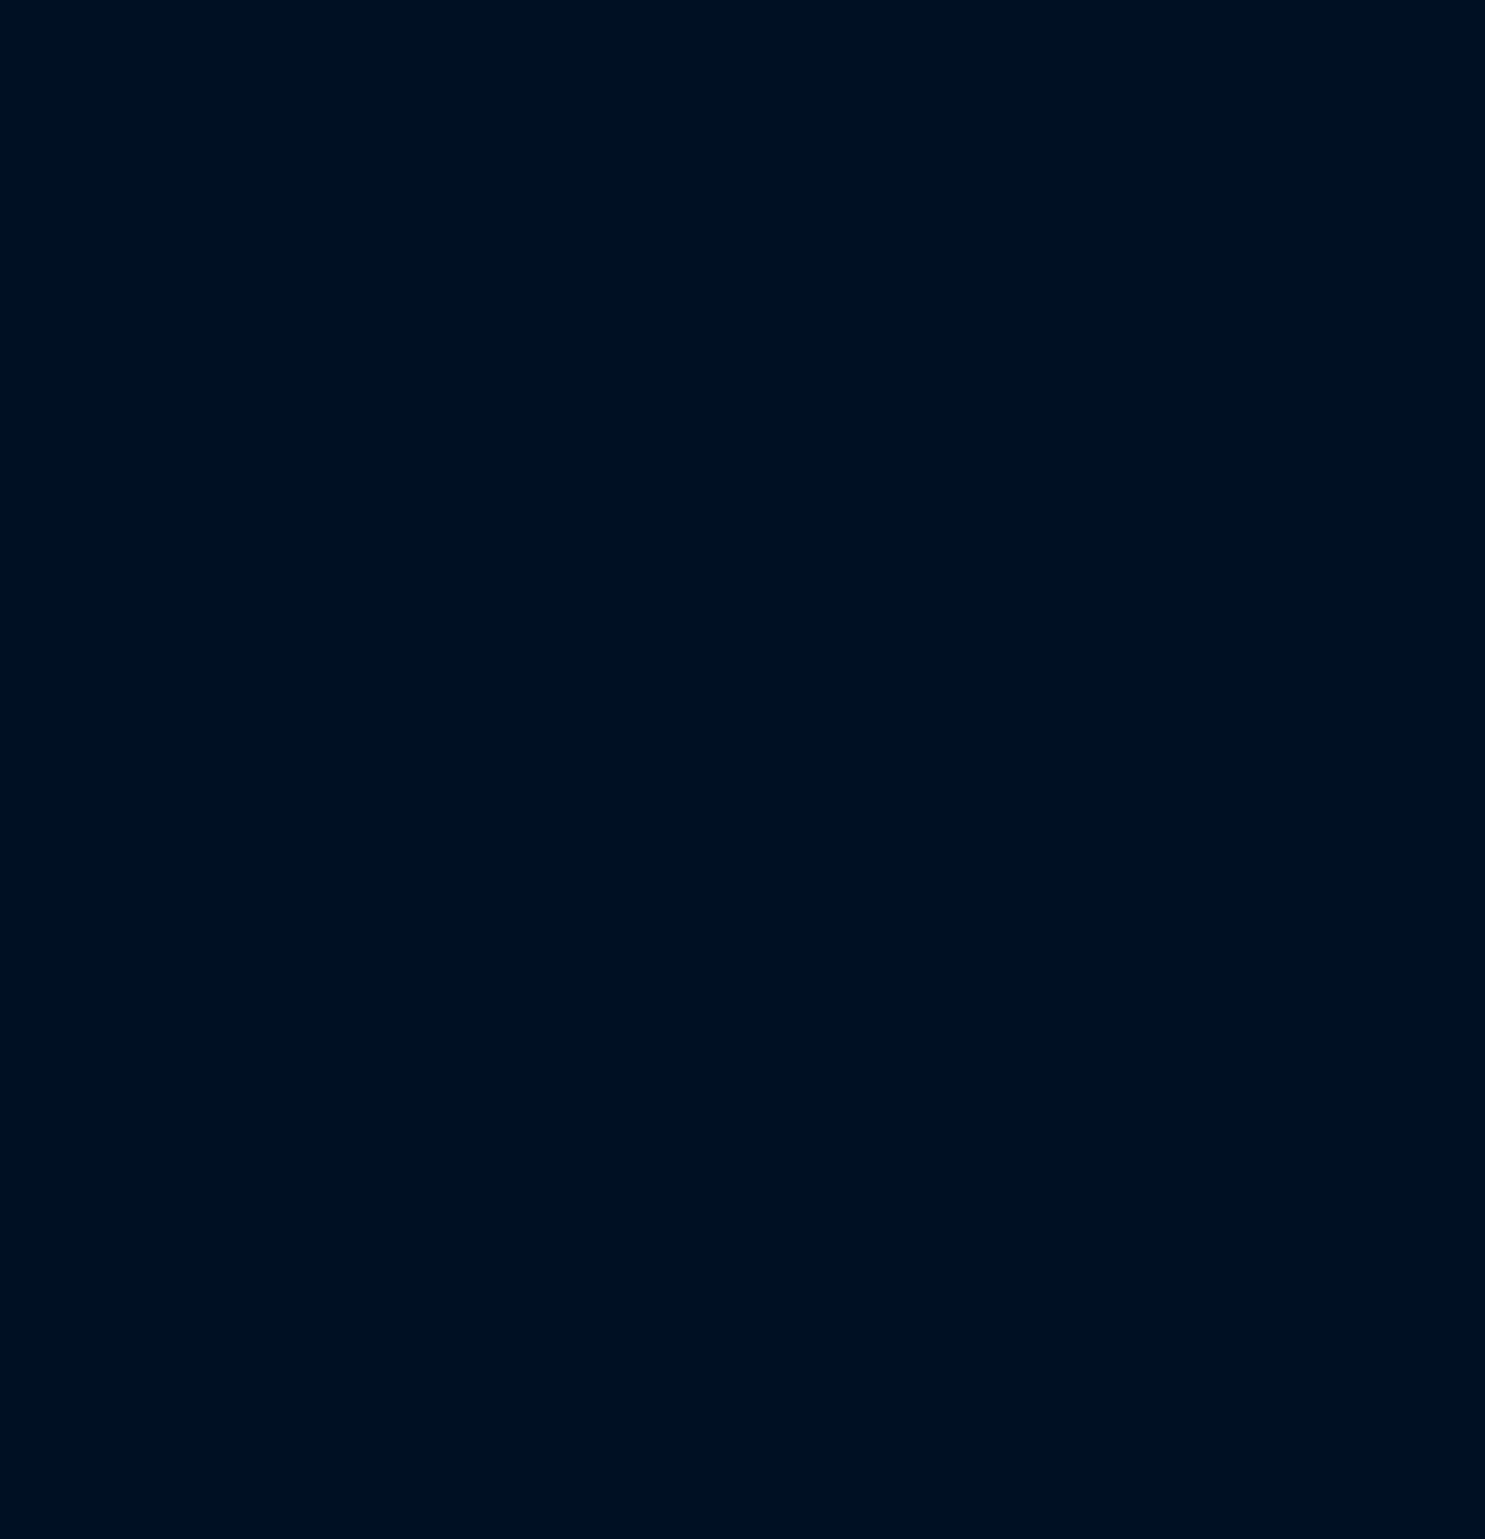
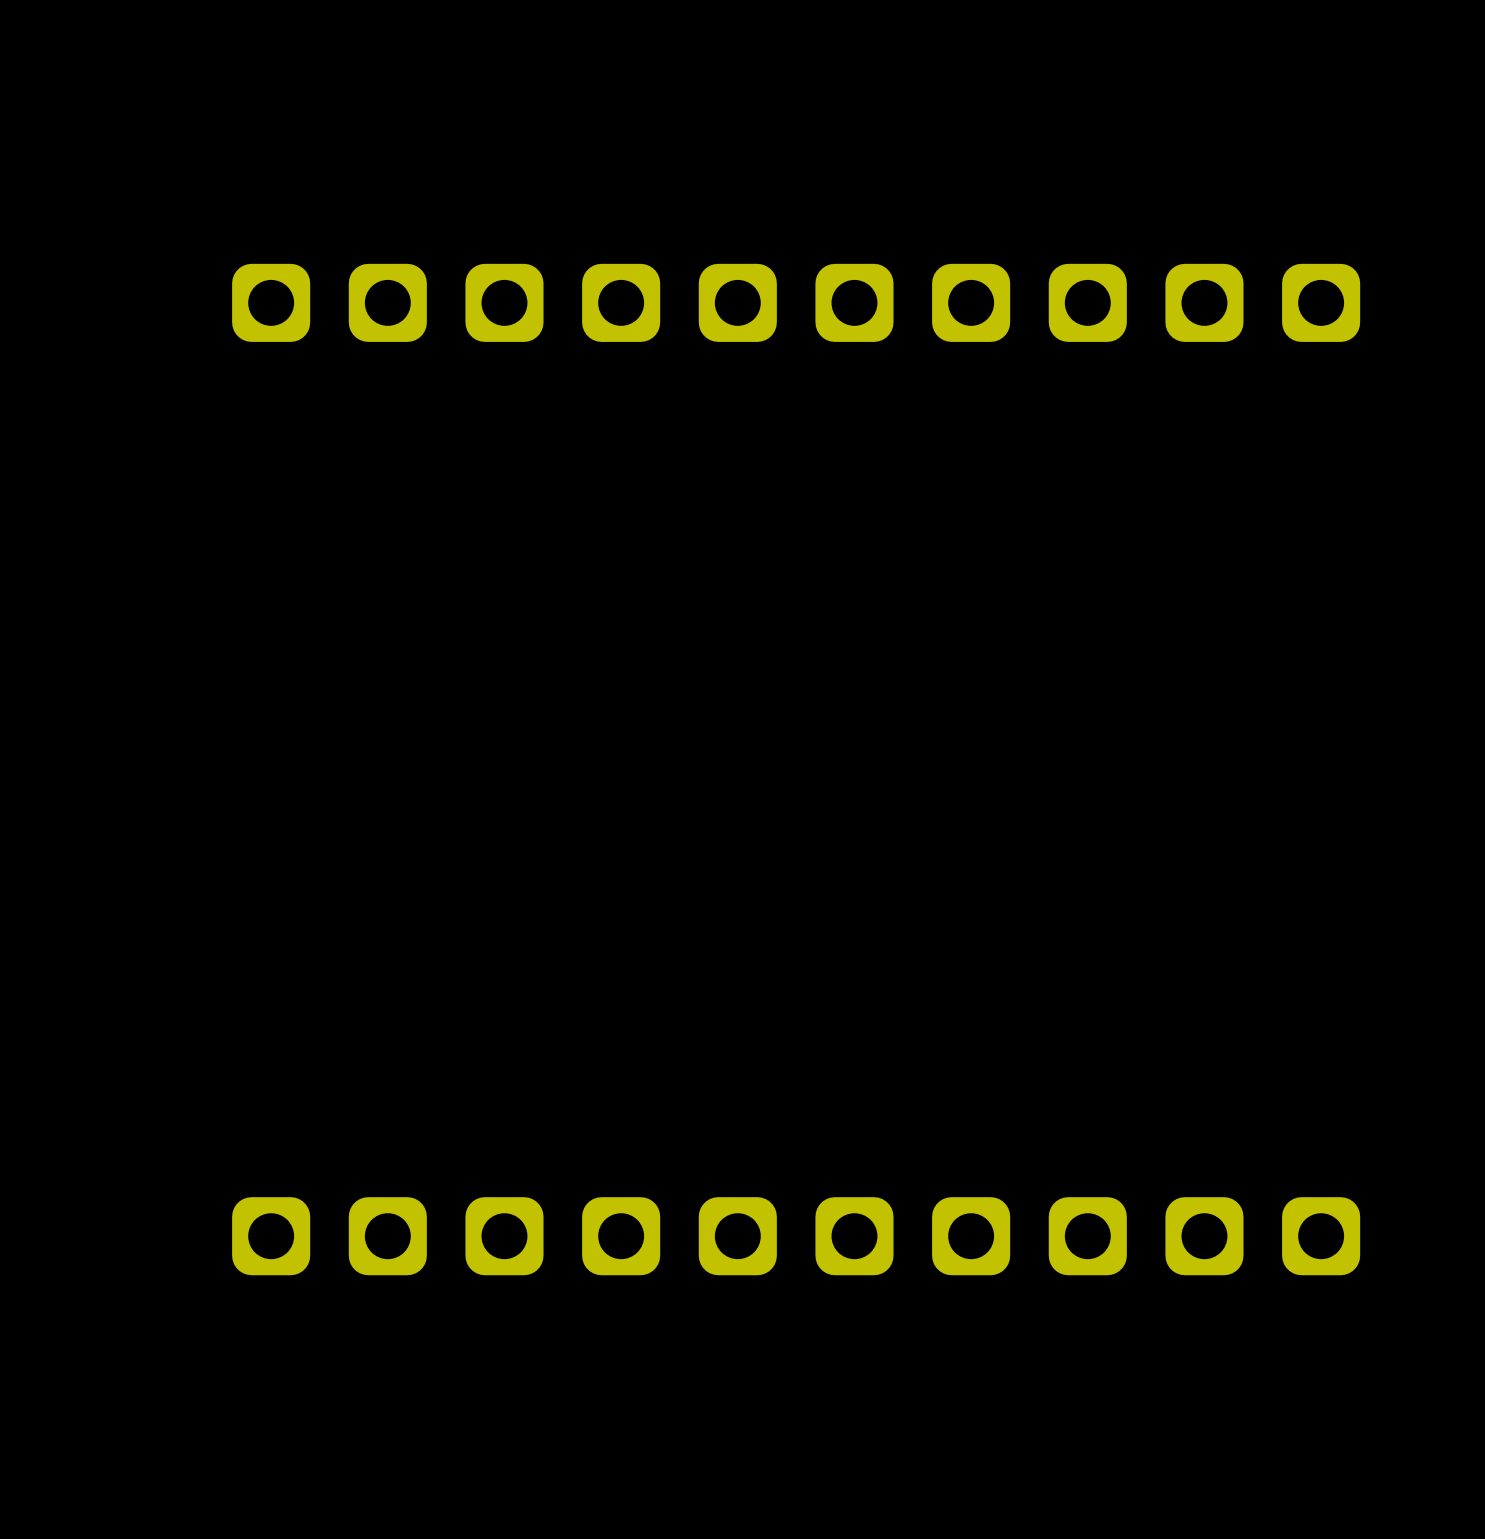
part: none -> (796, 302)
part: none -> (796, 1236)

